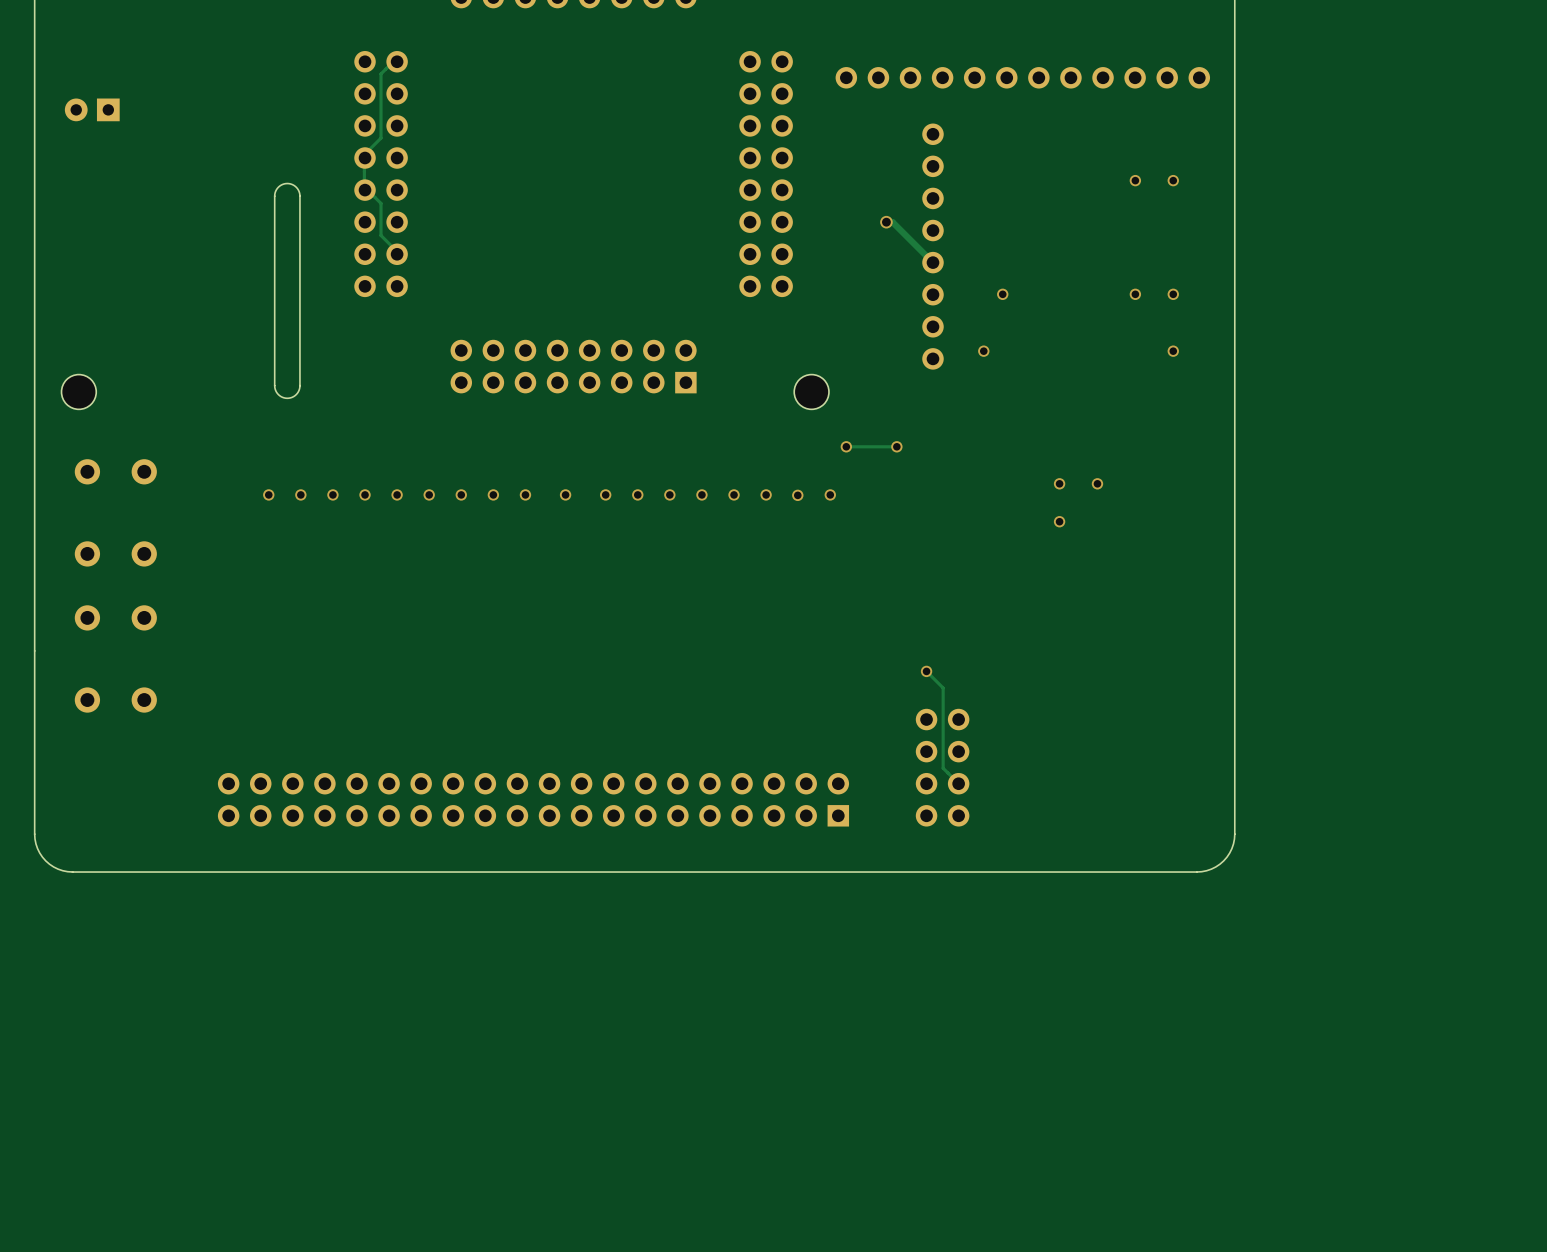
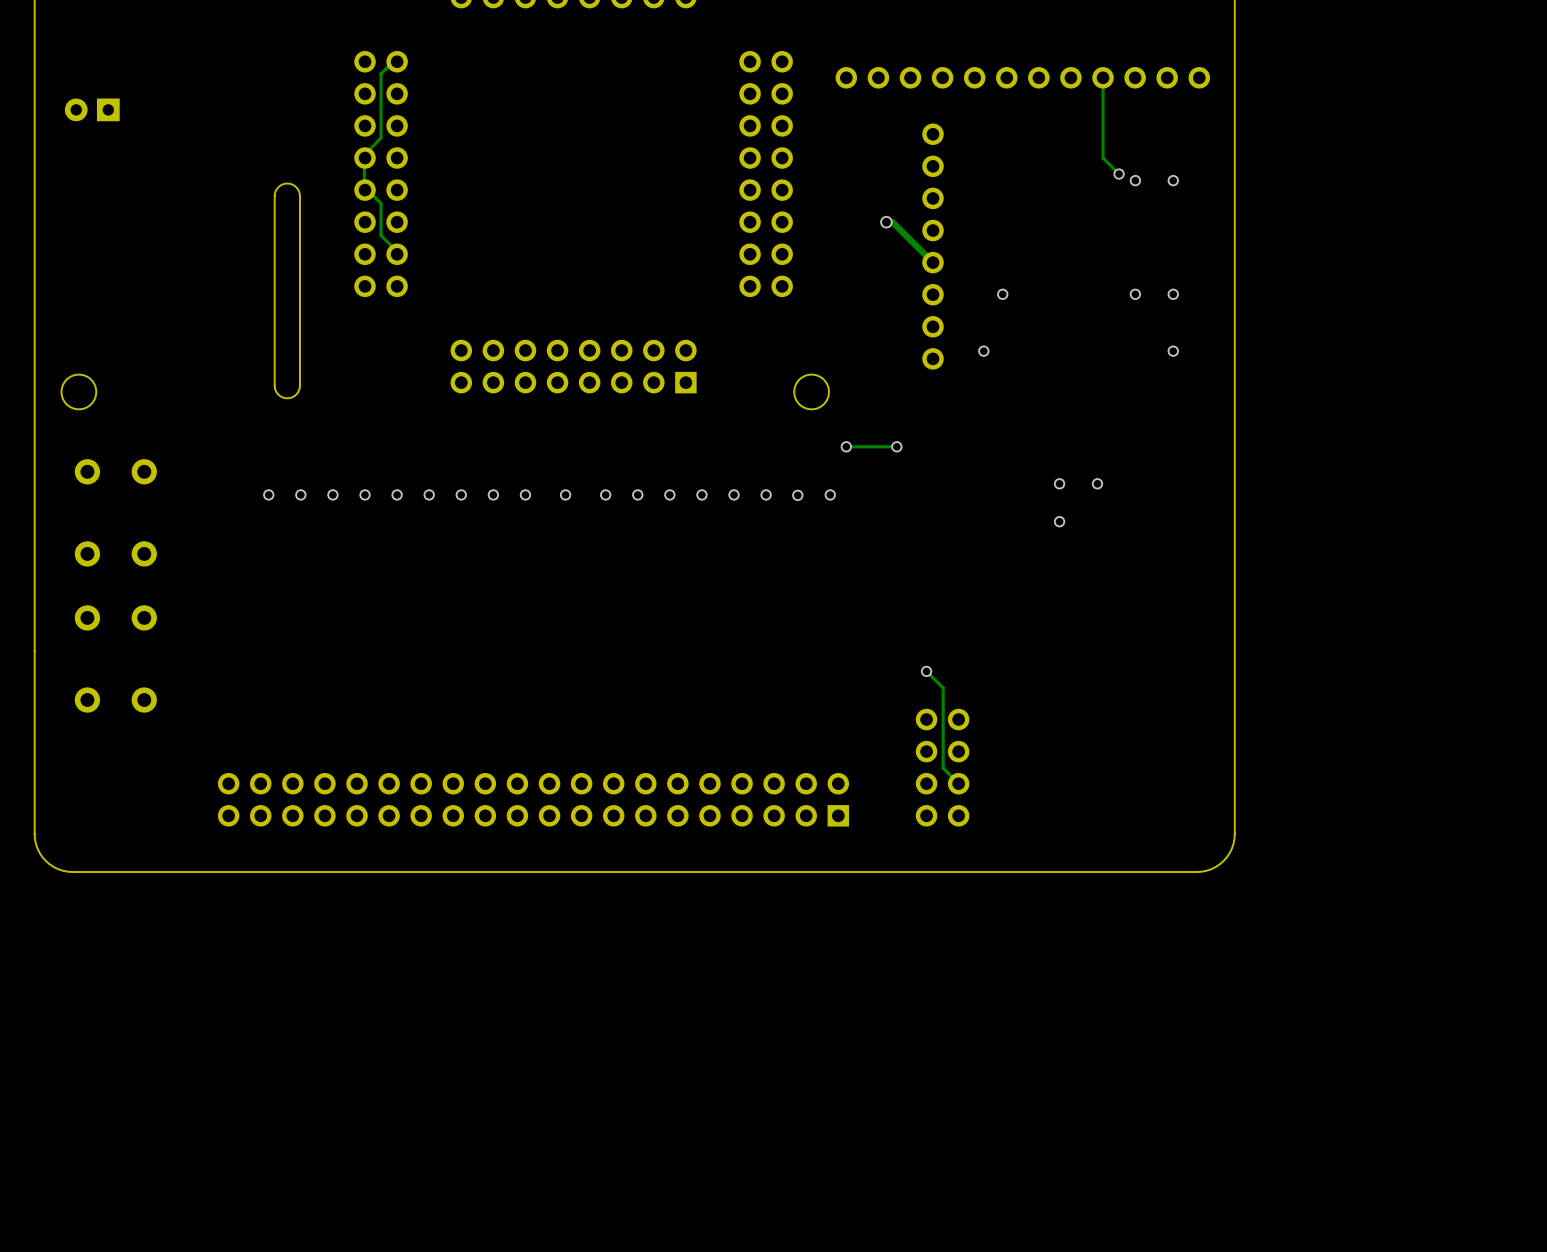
track: none -> (1103, 77) (1103, 158) (1119, 174)
via: none -> (1119, 174)

